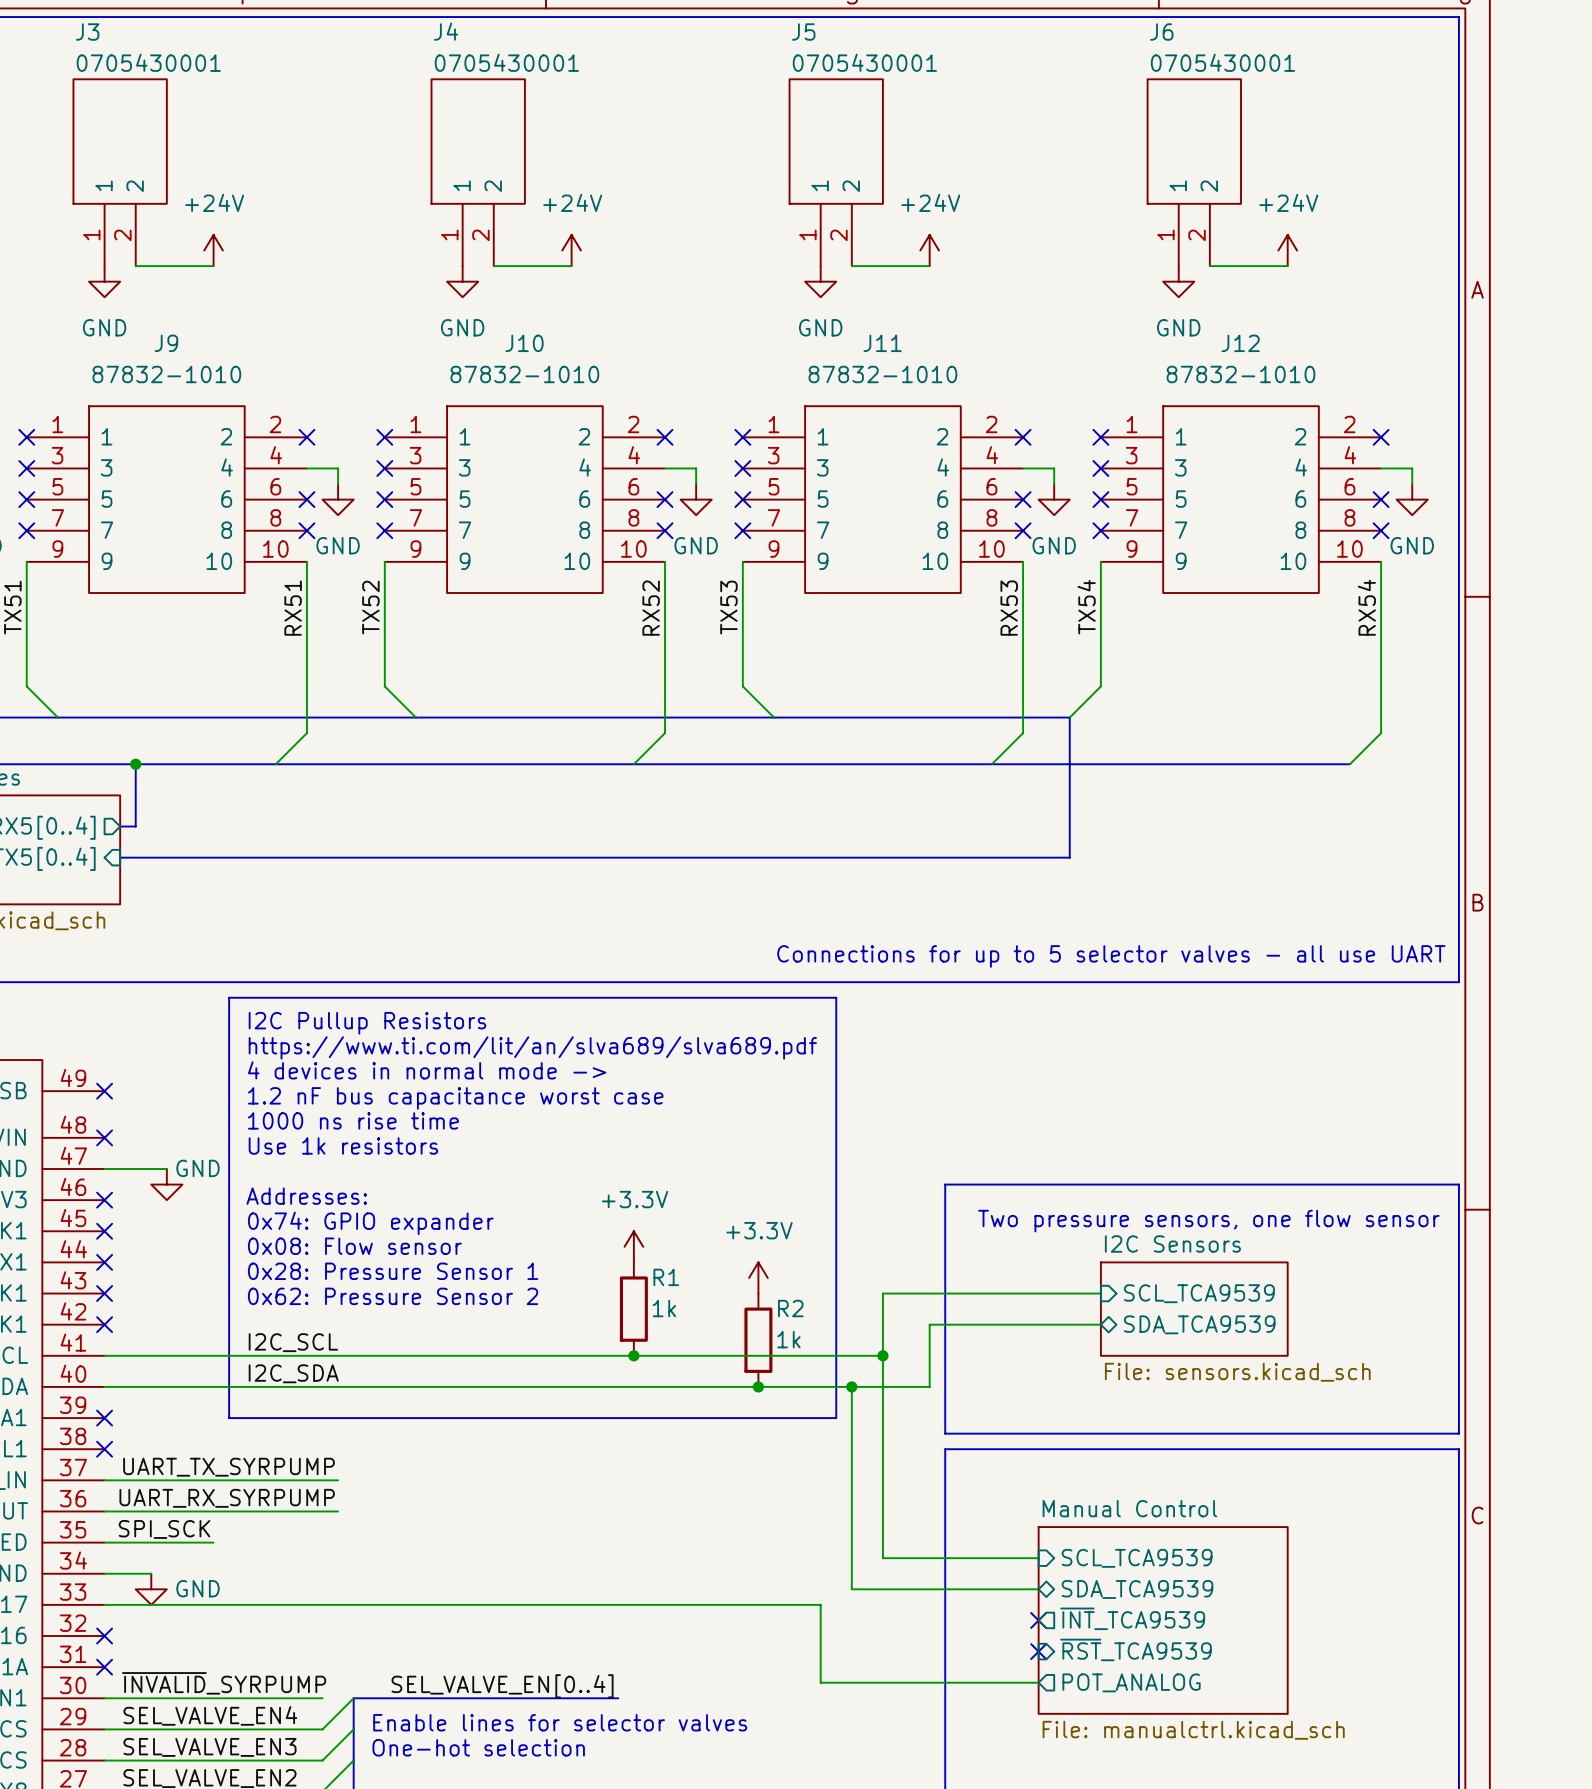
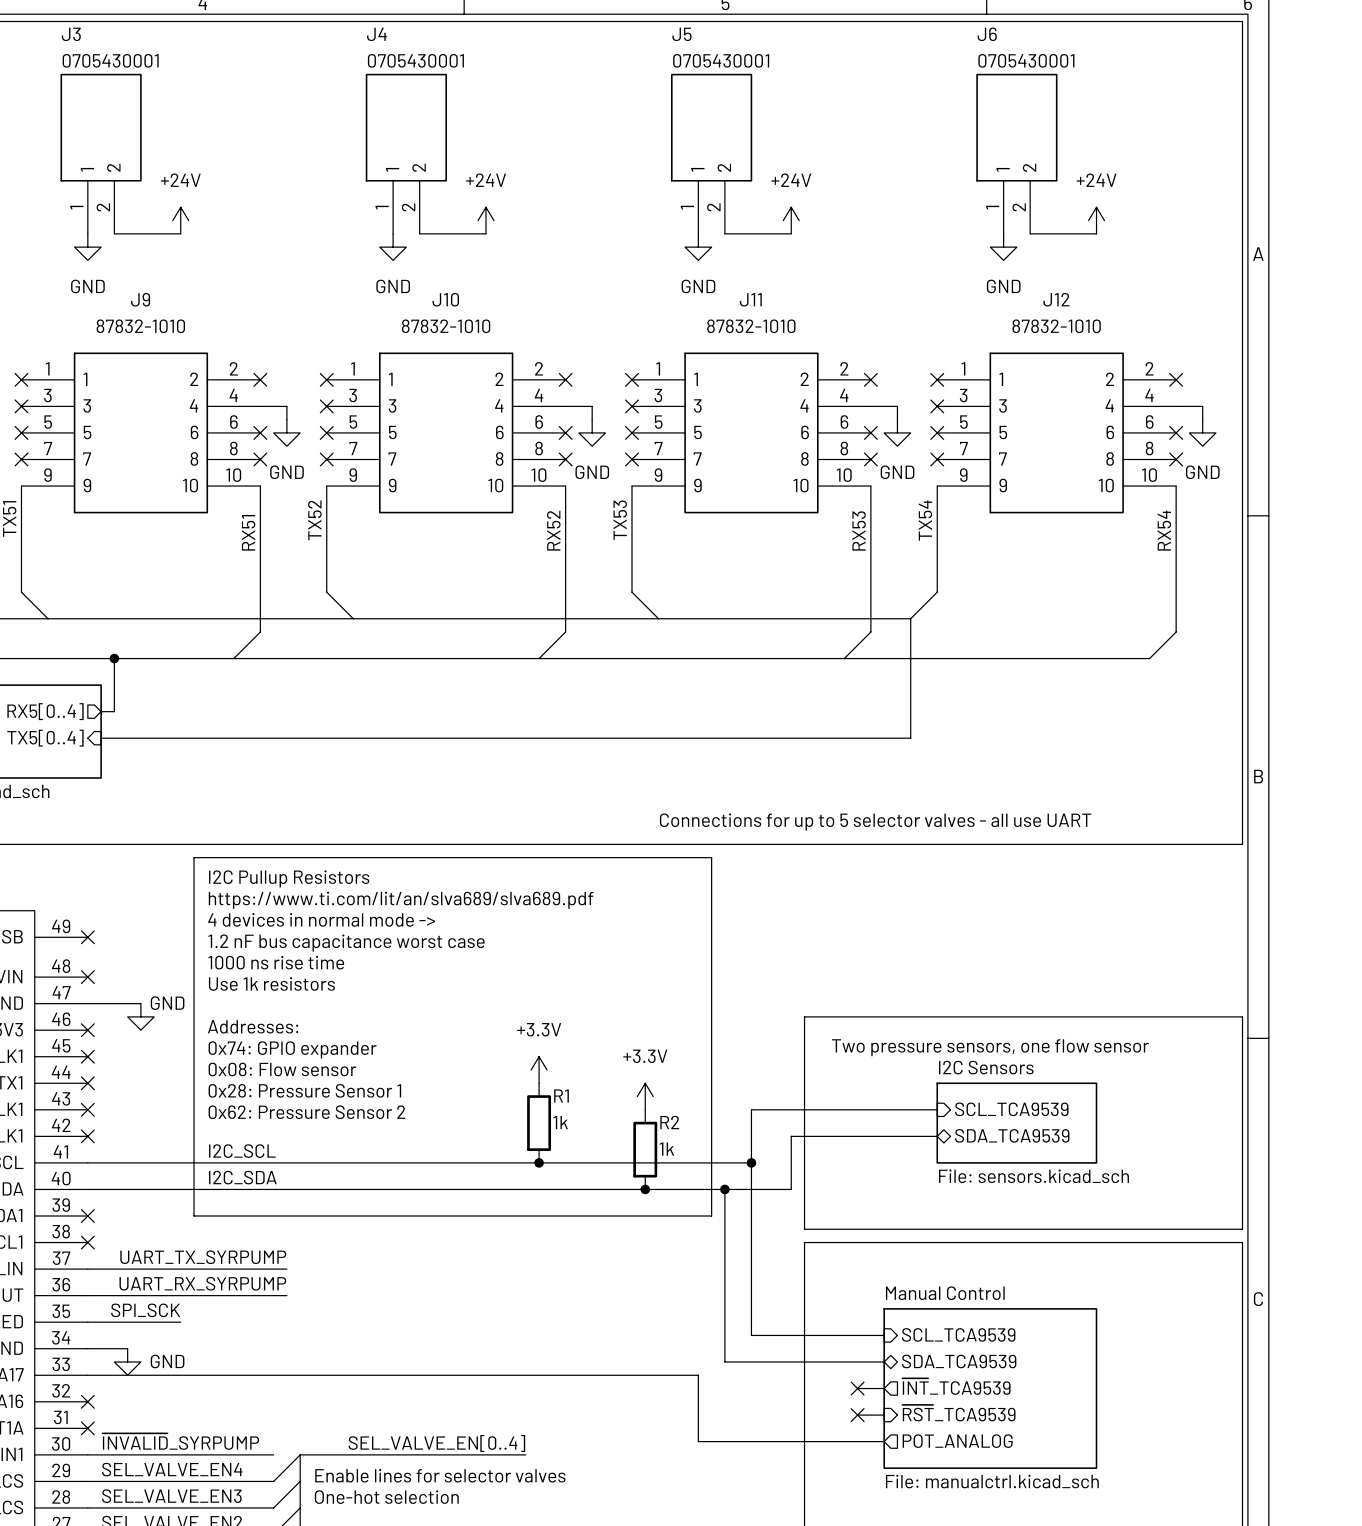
wire: none -> (857, 1388) (884, 1388)
no-connect mark: none -> (857, 1388)
no-connect mark: (1038, 1620) -> none
wire: none -> (857, 1415) (884, 1415)
no-connect mark: none -> (857, 1415)
no-connect mark: (1038, 1651) -> none

